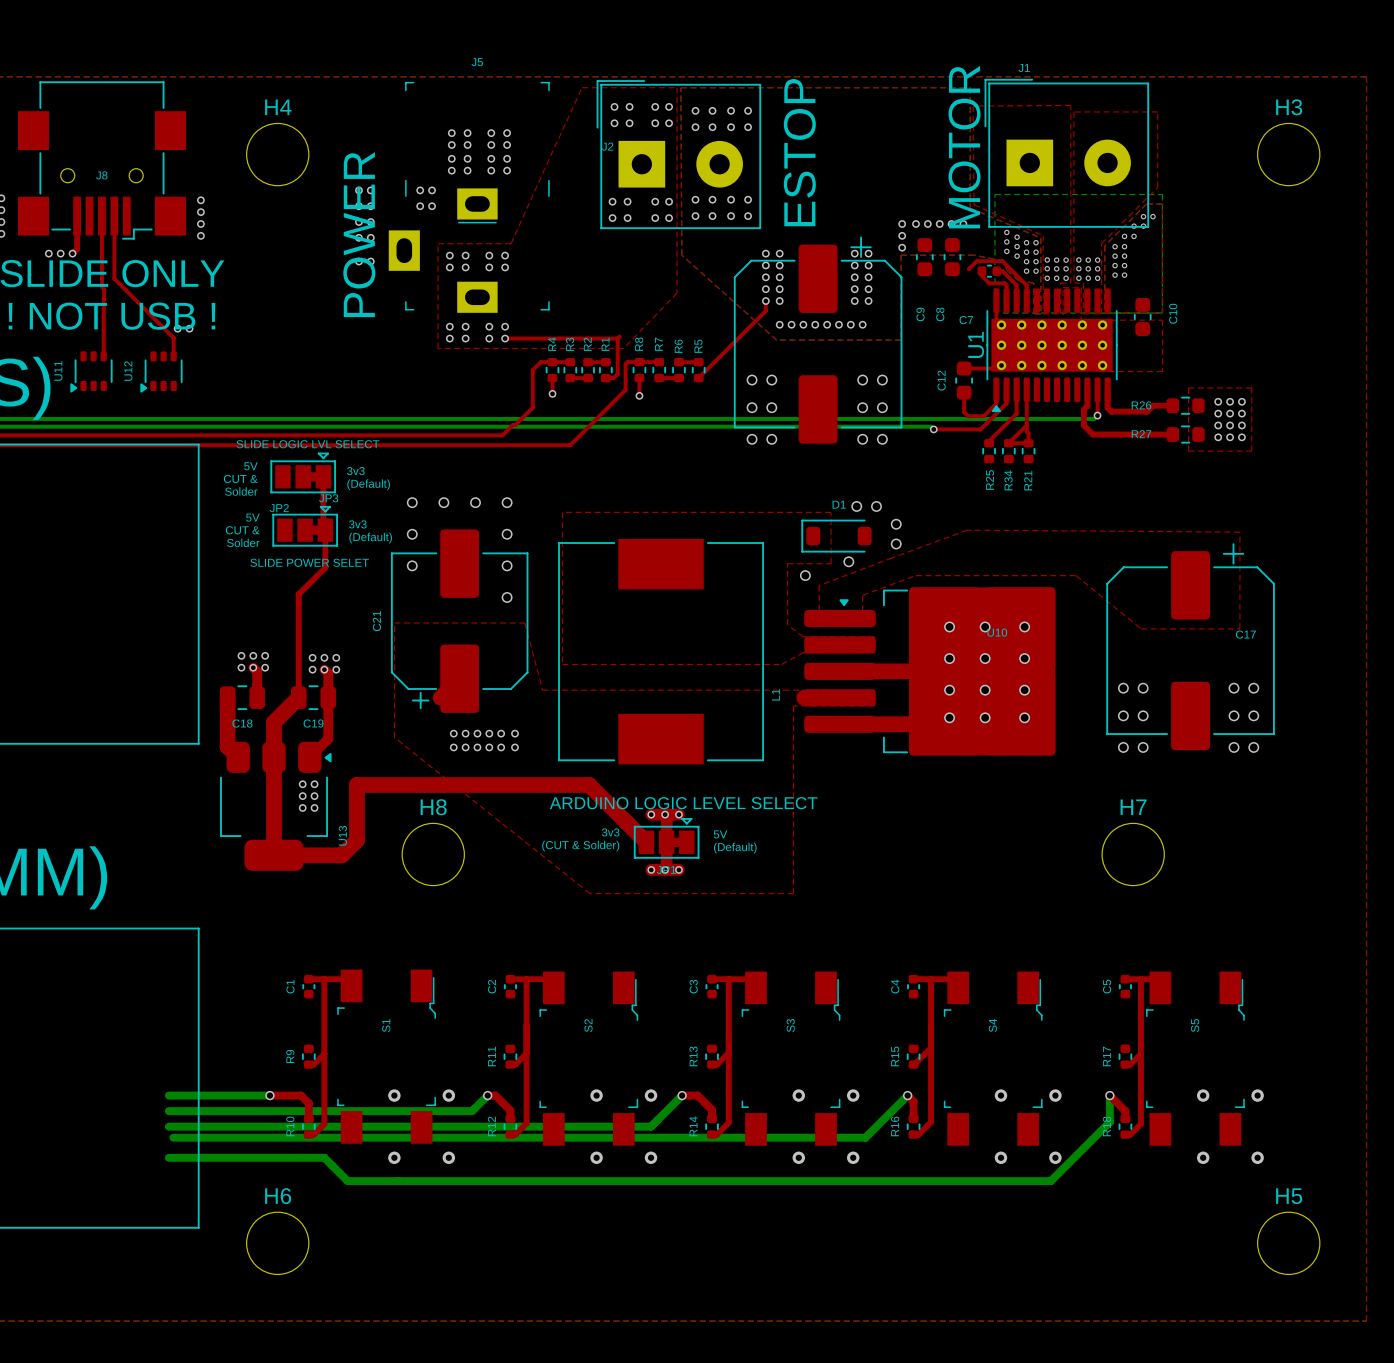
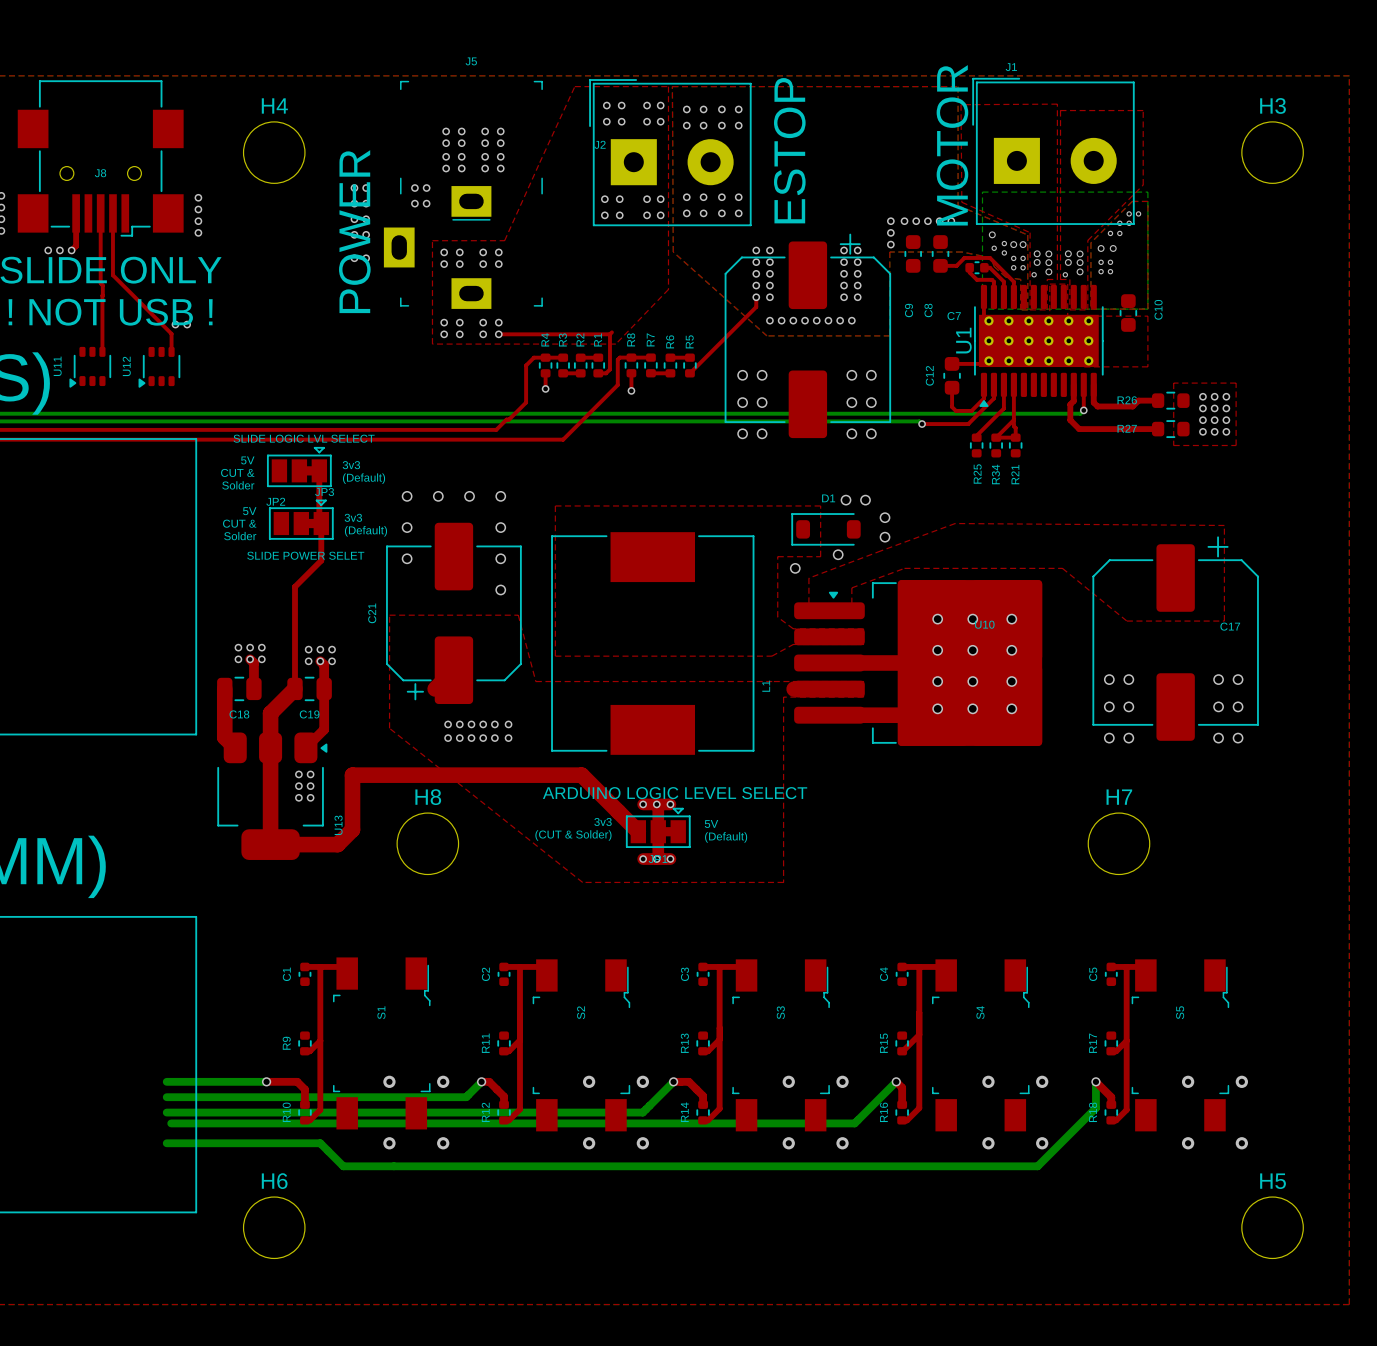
via: (1006, 232) -> none
via: none -> (992, 234)
via: (1017, 237) -> none
via: (1006, 241) -> none
via: (1026, 242) -> none
via: (1036, 242) -> none
via: (1115, 246) -> none
via: (1124, 246) -> none
via: none -> (1013, 244)
via: none -> (1023, 244)
via: none -> (1101, 248)
via: none -> (1113, 248)
via: (1026, 252) -> none
via: (1036, 252) -> none
via: (1115, 256) -> none
via: (1124, 256) -> none
via: none -> (1037, 253)
via: none -> (1048, 253)
via: none -> (1068, 253)
via: none -> (1080, 253)
via: (1047, 259) -> none
via: (1078, 259) -> none
via: (1056, 260) -> none
via: (1066, 260) -> none
via: (1088, 260) -> none
via: (1097, 260) -> none
via: none -> (1037, 262)
via: none -> (1048, 262)
via: none -> (1068, 262)
via: none -> (1080, 262)
via: (1047, 268) -> none
via: (1056, 268) -> none
via: (1066, 268) -> none
via: (1078, 268) -> none
via: (1088, 268) -> none
via: (1097, 268) -> none
top track: none -> (940, 265) (956, 265)
via: none -> (1048, 271)
via: none -> (1080, 271)
via: (1056, 278) -> none
via: (1066, 278) -> none
via: (1088, 278) -> none
via: (1097, 278) -> none

